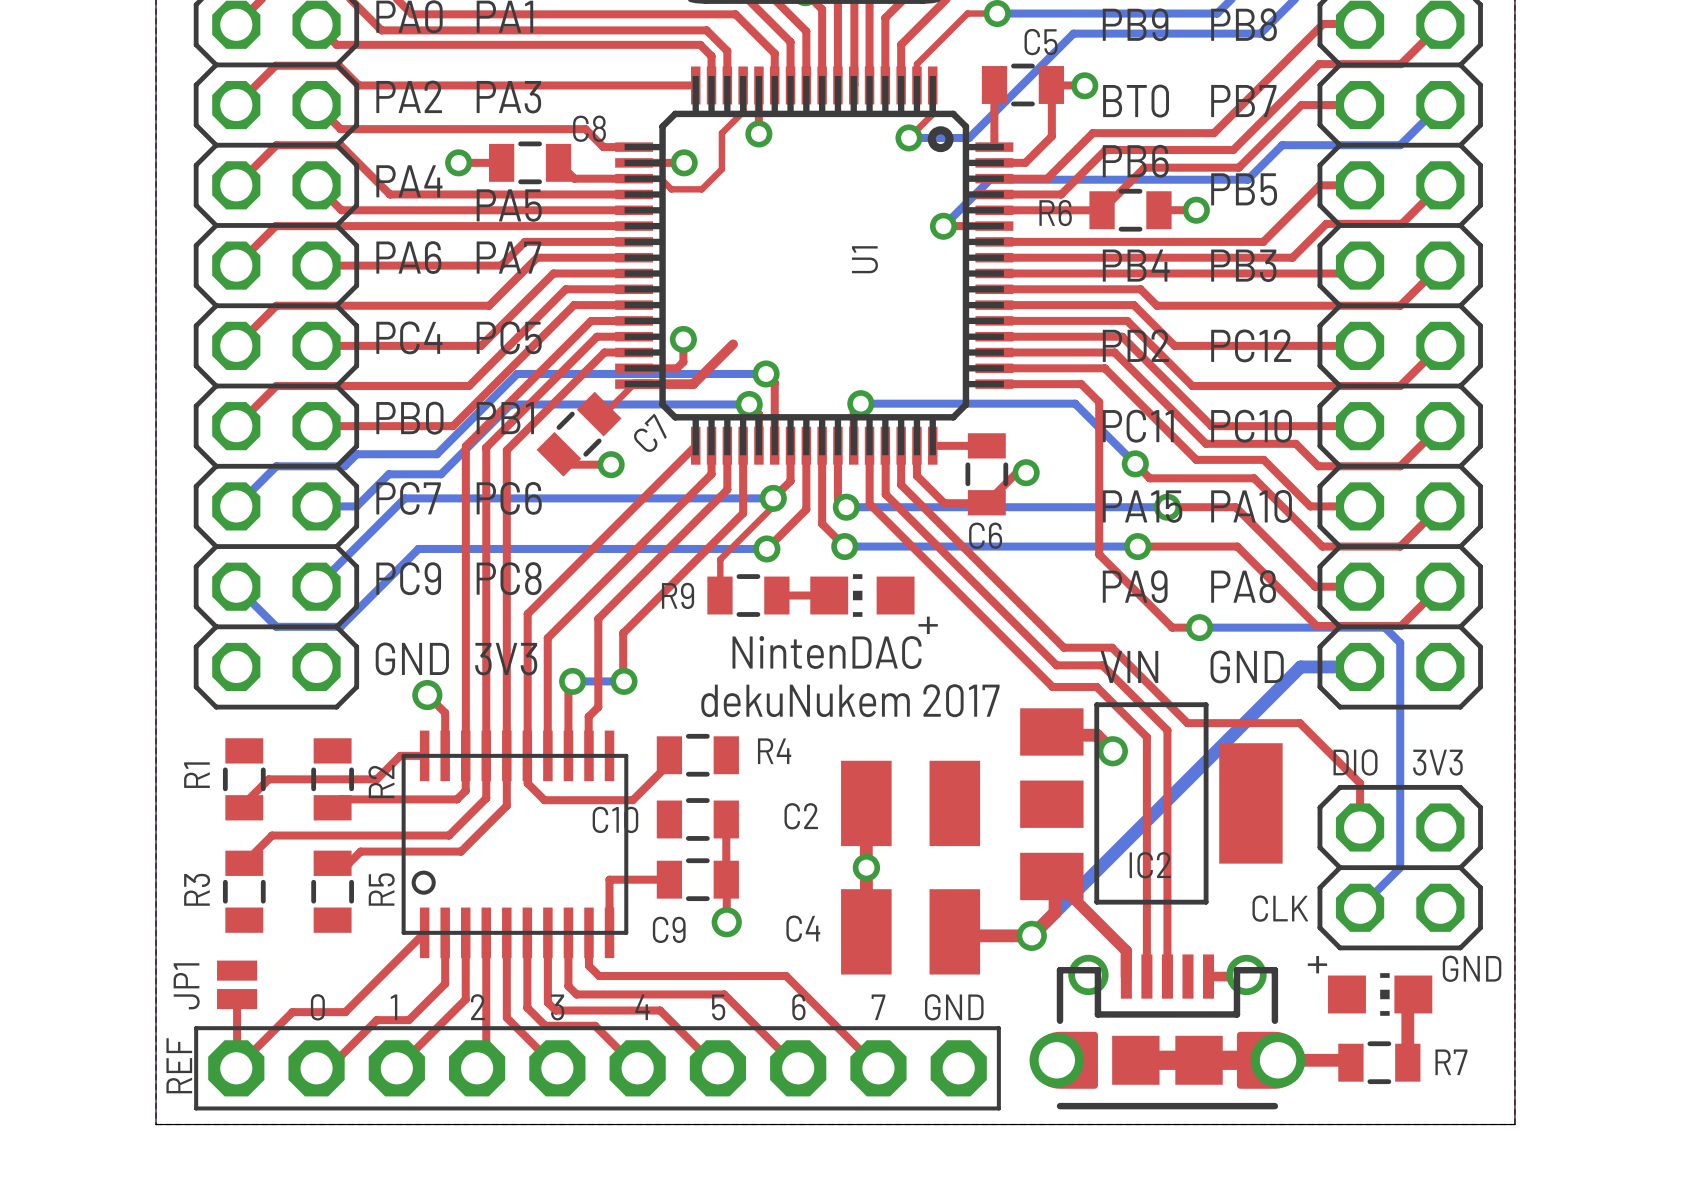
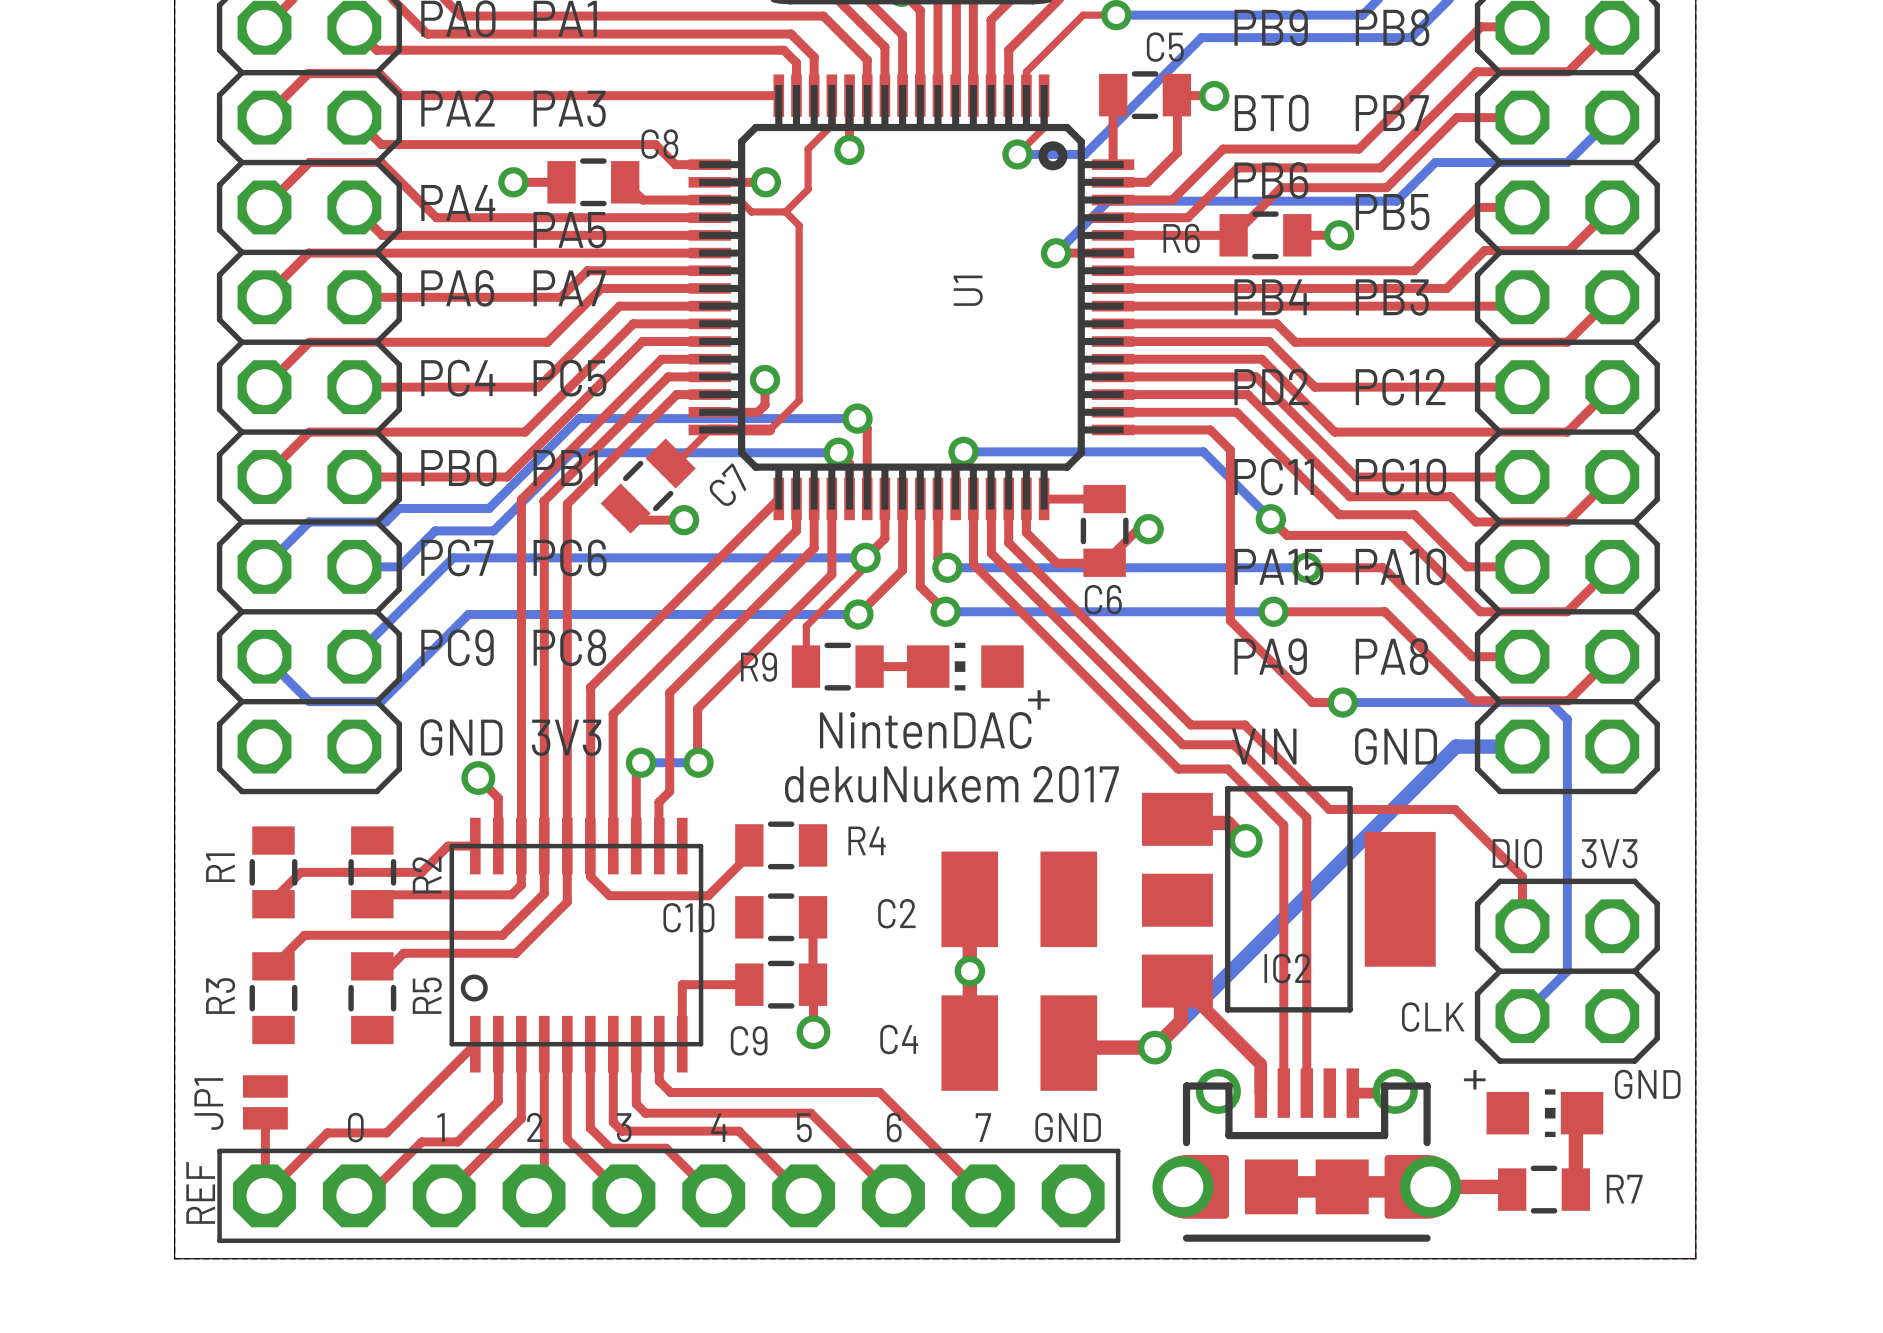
top track: (733, 344) (693, 384) (687, 384) -> (785, 211) (799, 225) (799, 400) (769, 429)

